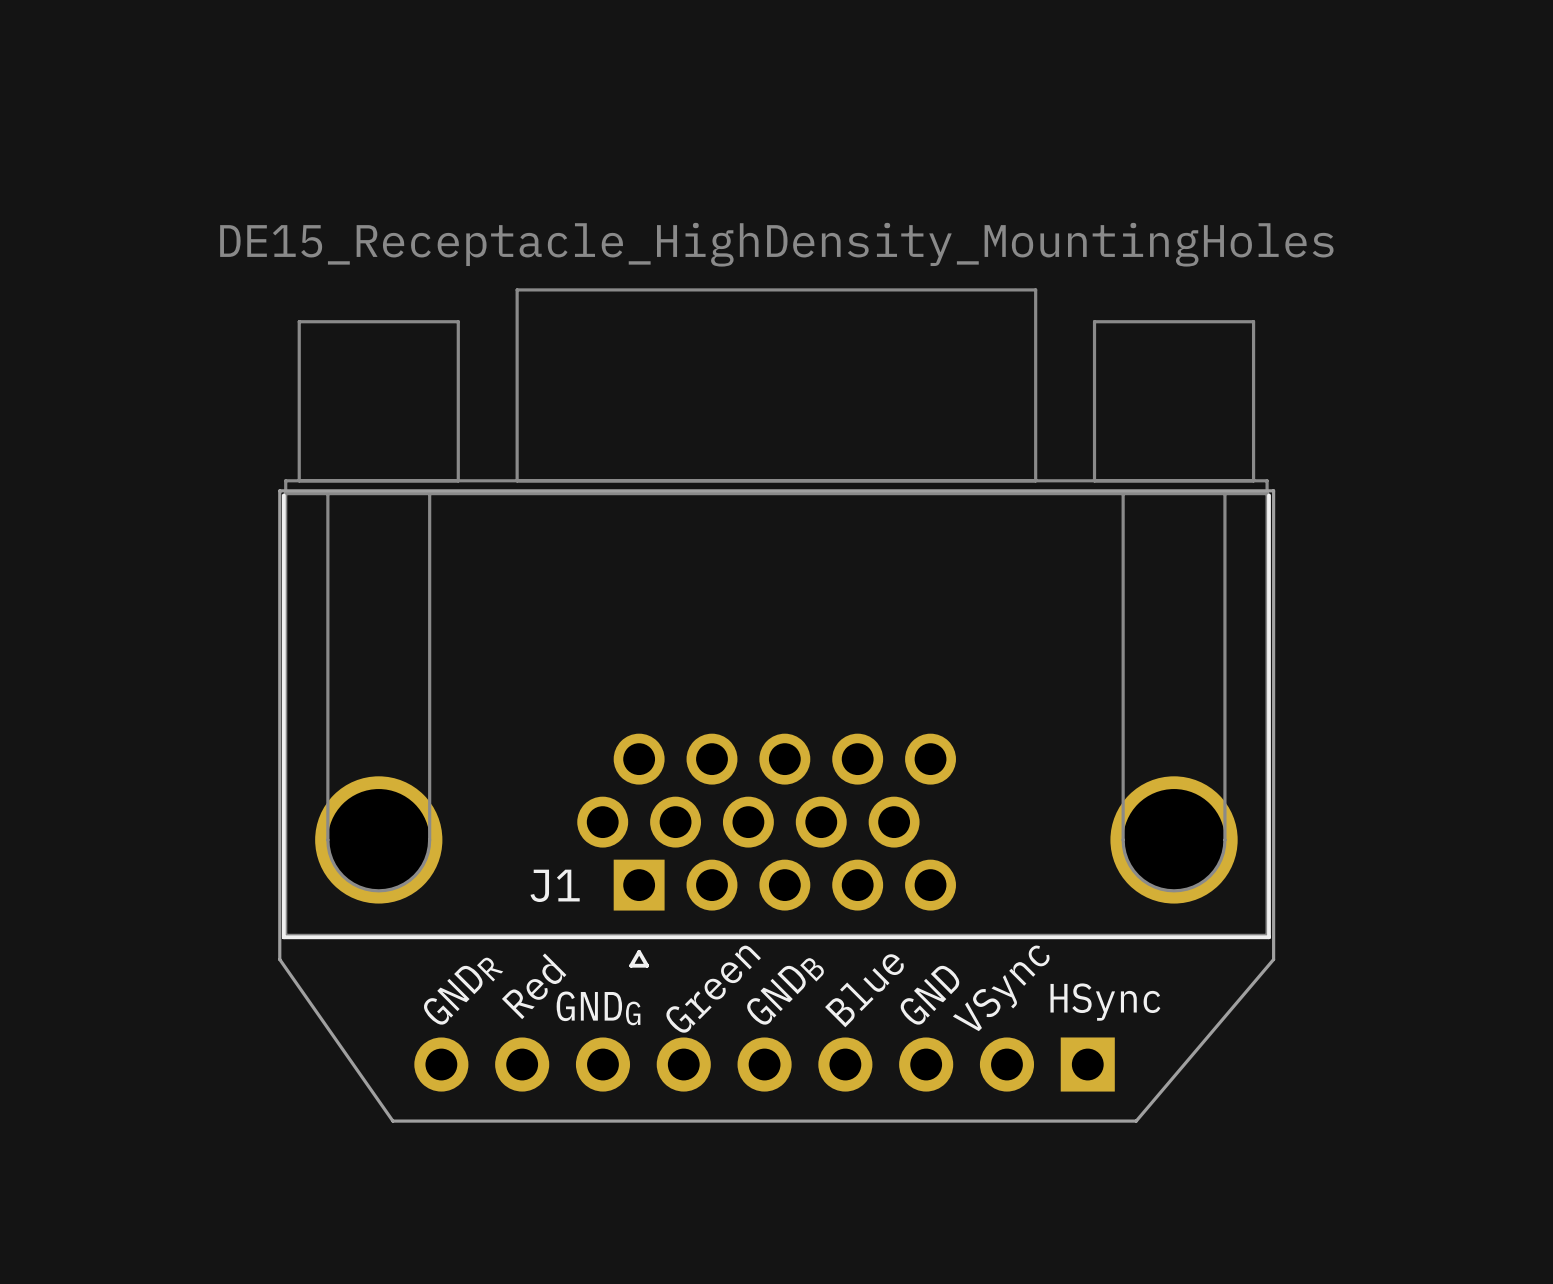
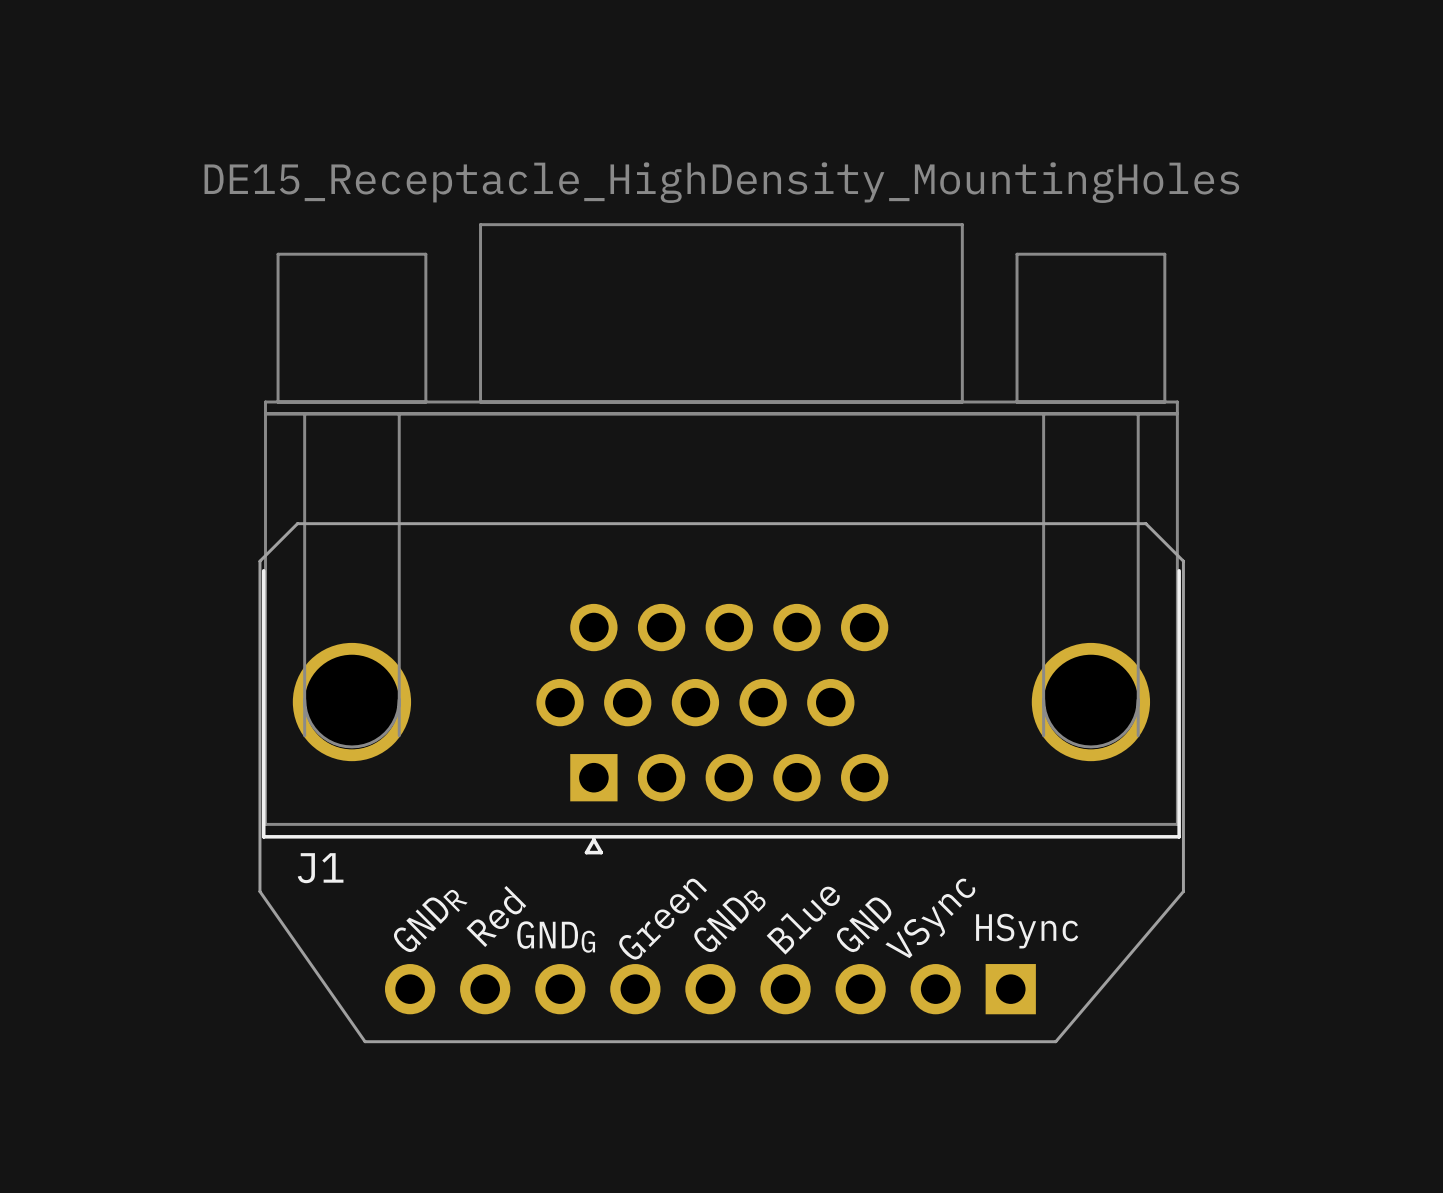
J1 footprint: [281, 288, 1271, 968] -> [261, 223, 1181, 855]
board edge: (279, 603) (279, 490) (1273, 490) (1273, 603) -> (259, 561) (297, 523) (1145, 523) (1183, 561)
J1 name position: J1 (555, 885) -> J1 (320, 868)

